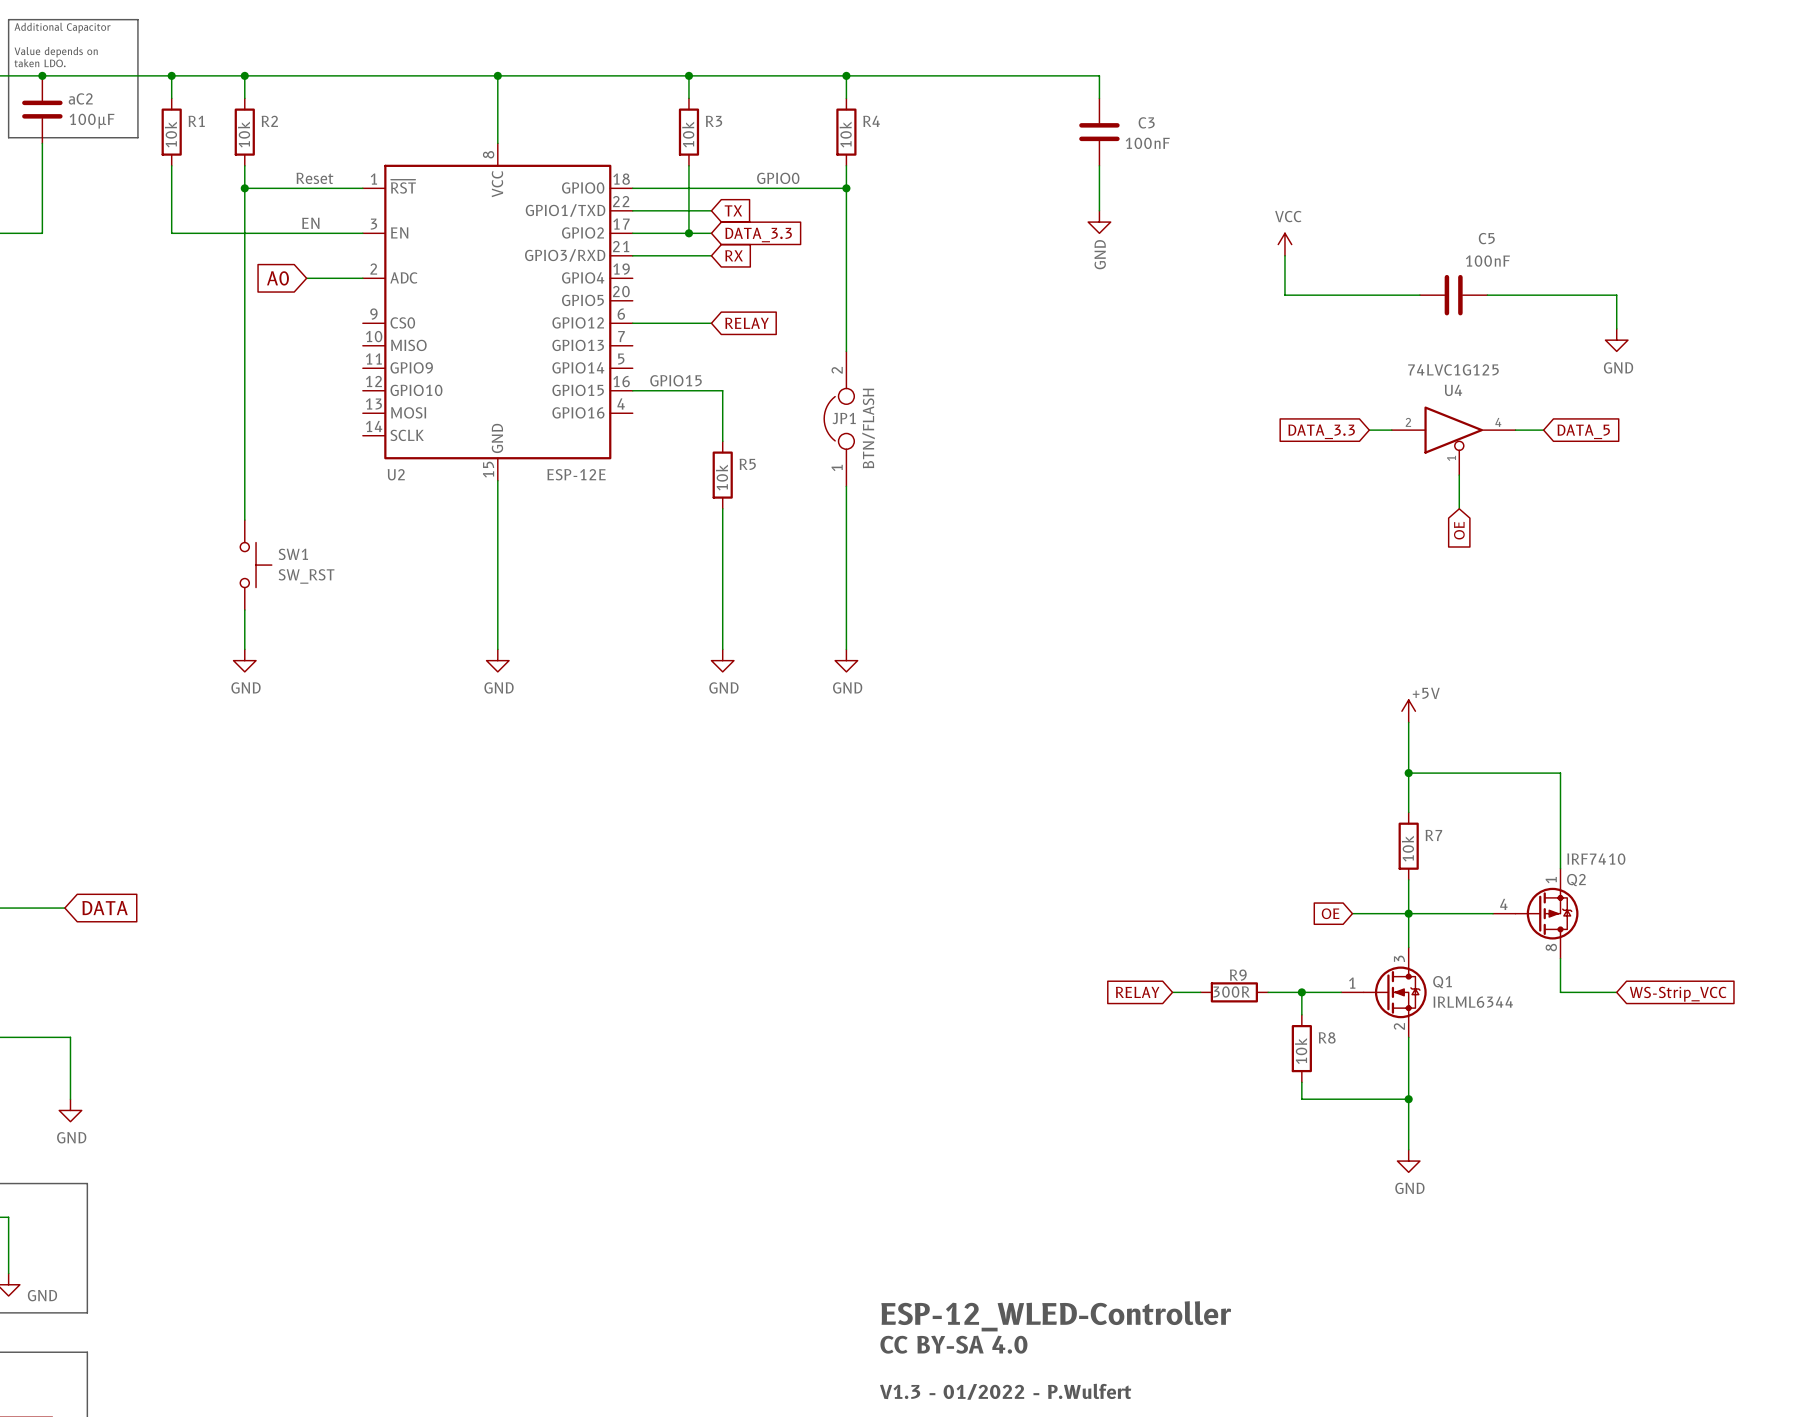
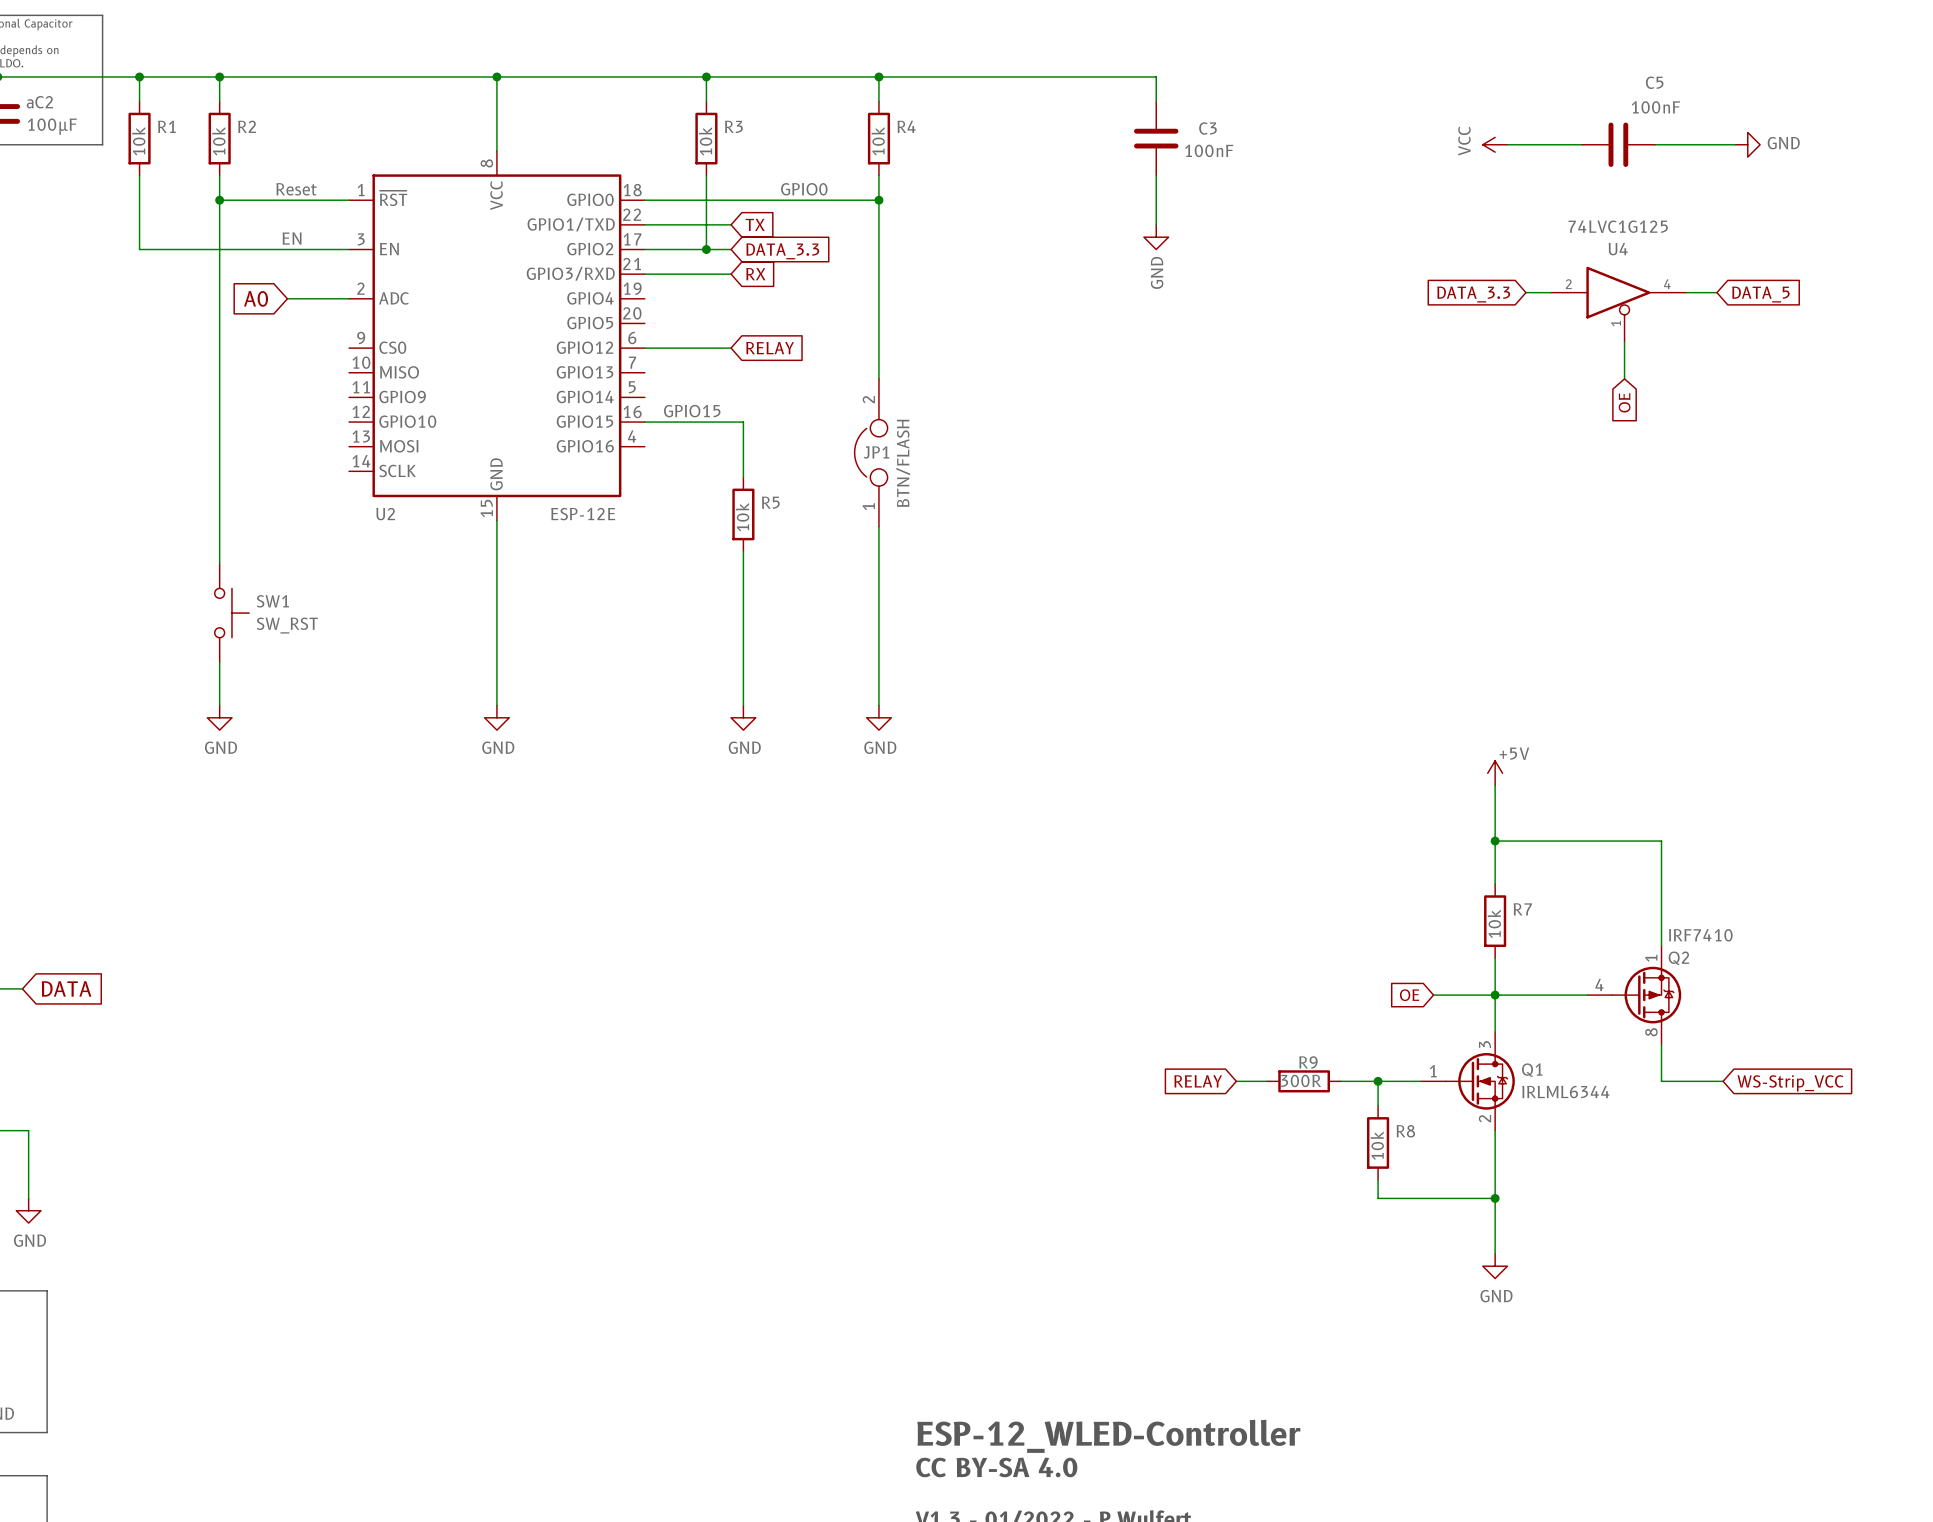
wire: none -> (1507, 144) (1581, 144)
wire: none -> (1655, 144) (1735, 144)
power symbol rotation: 0° (1284, 244) -> 90° counterclockwise (1495, 144)
power symbol position: VCC (1284, 244) -> VCC (1495, 144)
wire: (1284, 255) (1284, 295) (1419, 295) -> none
C5 position: (1453, 295) -> (1618, 144)
wire: (1487, 295) (1616, 295) (1616, 328) -> none
power symbol rotation: 0° (1616, 340) -> 90° counterclockwise (1747, 144)
power symbol position: GND (1616, 340) -> GND (1747, 144)
wire: (1369, 430) (1391, 430) -> (1525, 292) (1550, 292)
wire: (1515, 430) (1543, 430) -> (1686, 292) (1716, 292)
global label position: DATA_3.3 (1321, 431) -> DATA_3.3 (1473, 294)
global label position: DATA_5 (1583, 431) -> DATA_5 (1760, 294)
U4 position: (1453, 440) -> (1618, 304)
wire: (1459, 475) (1459, 508) -> (1624, 341) (1624, 378)
global label position: OE (1459, 530) -> OE (1624, 402)

